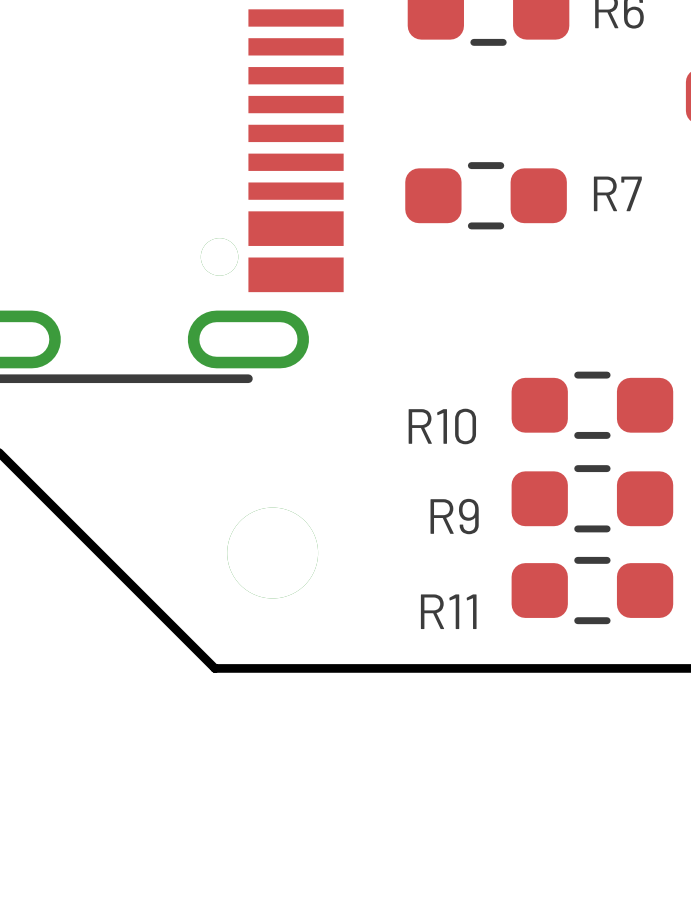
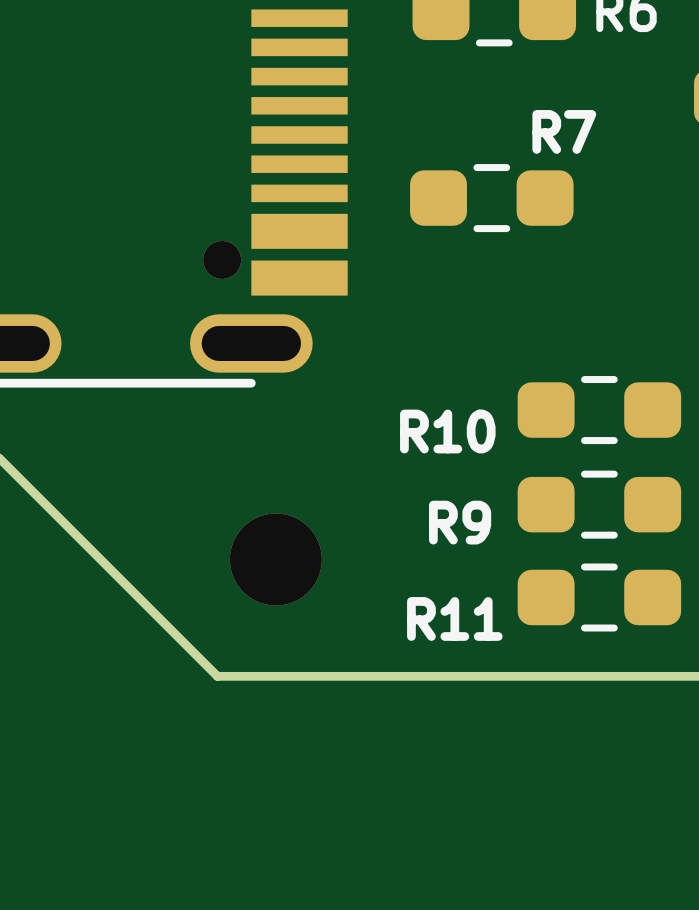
R7 name position: R7 (617, 193) -> R7 (564, 131)

